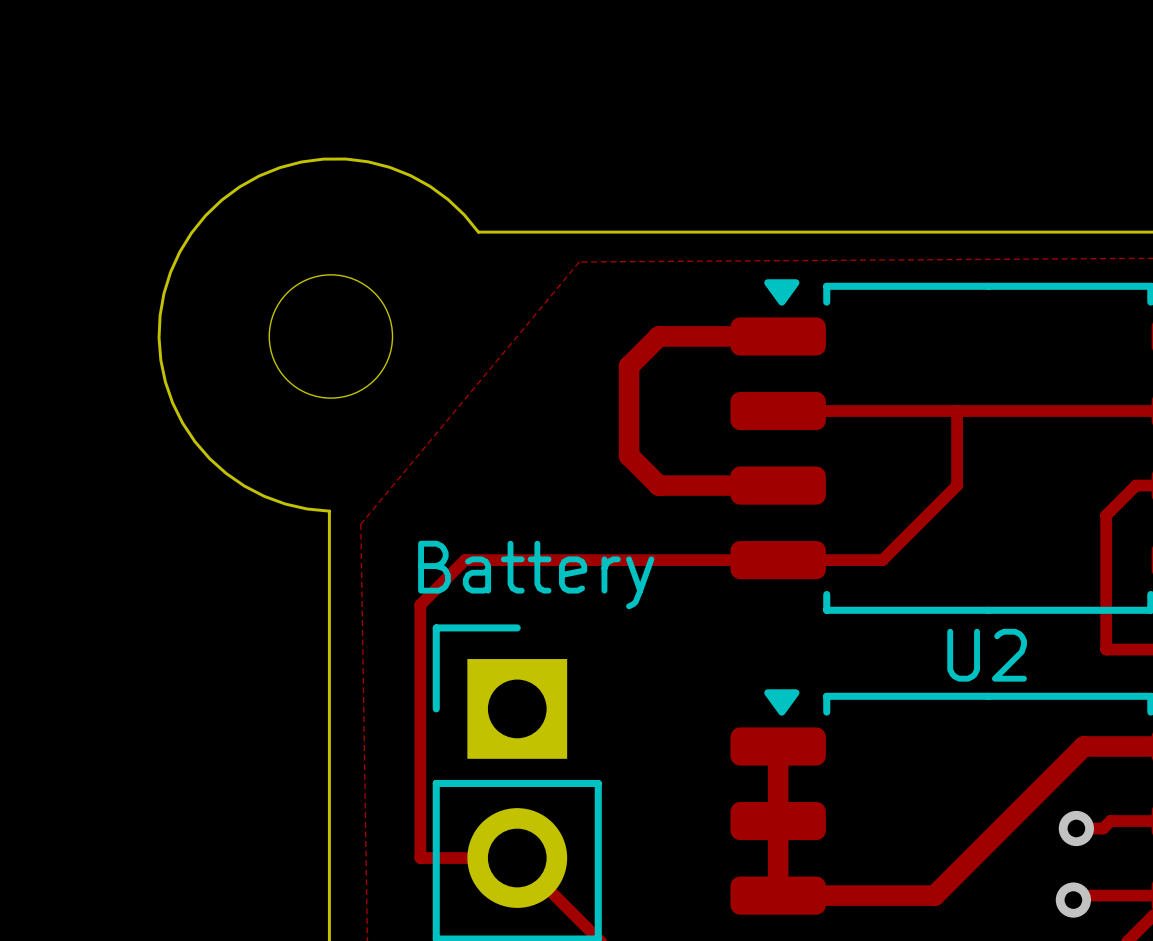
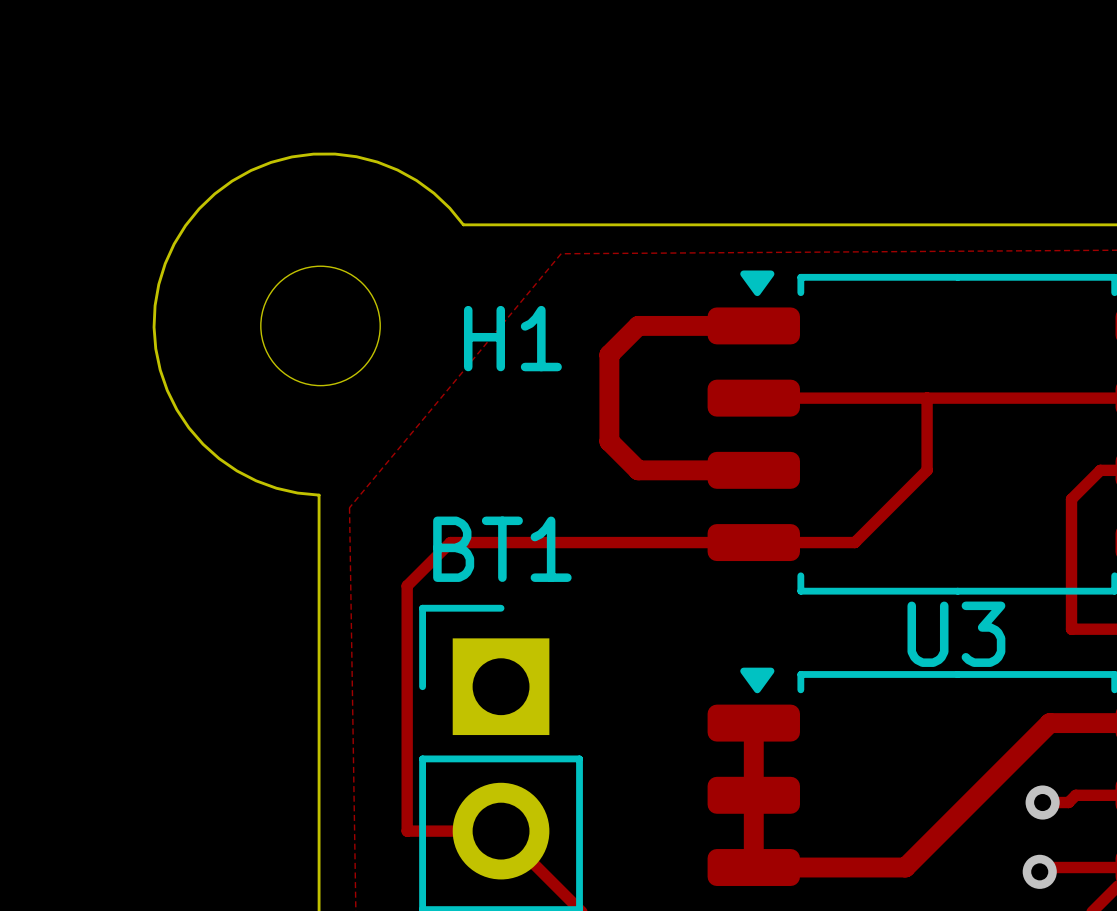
H1 name: none -> H1 (512, 338)
BT1 name: none -> BT1 (502, 549)
BT1 value: Battery (536, 574) -> none
U2 name: U2 (987, 655) -> U3 (956, 634)

